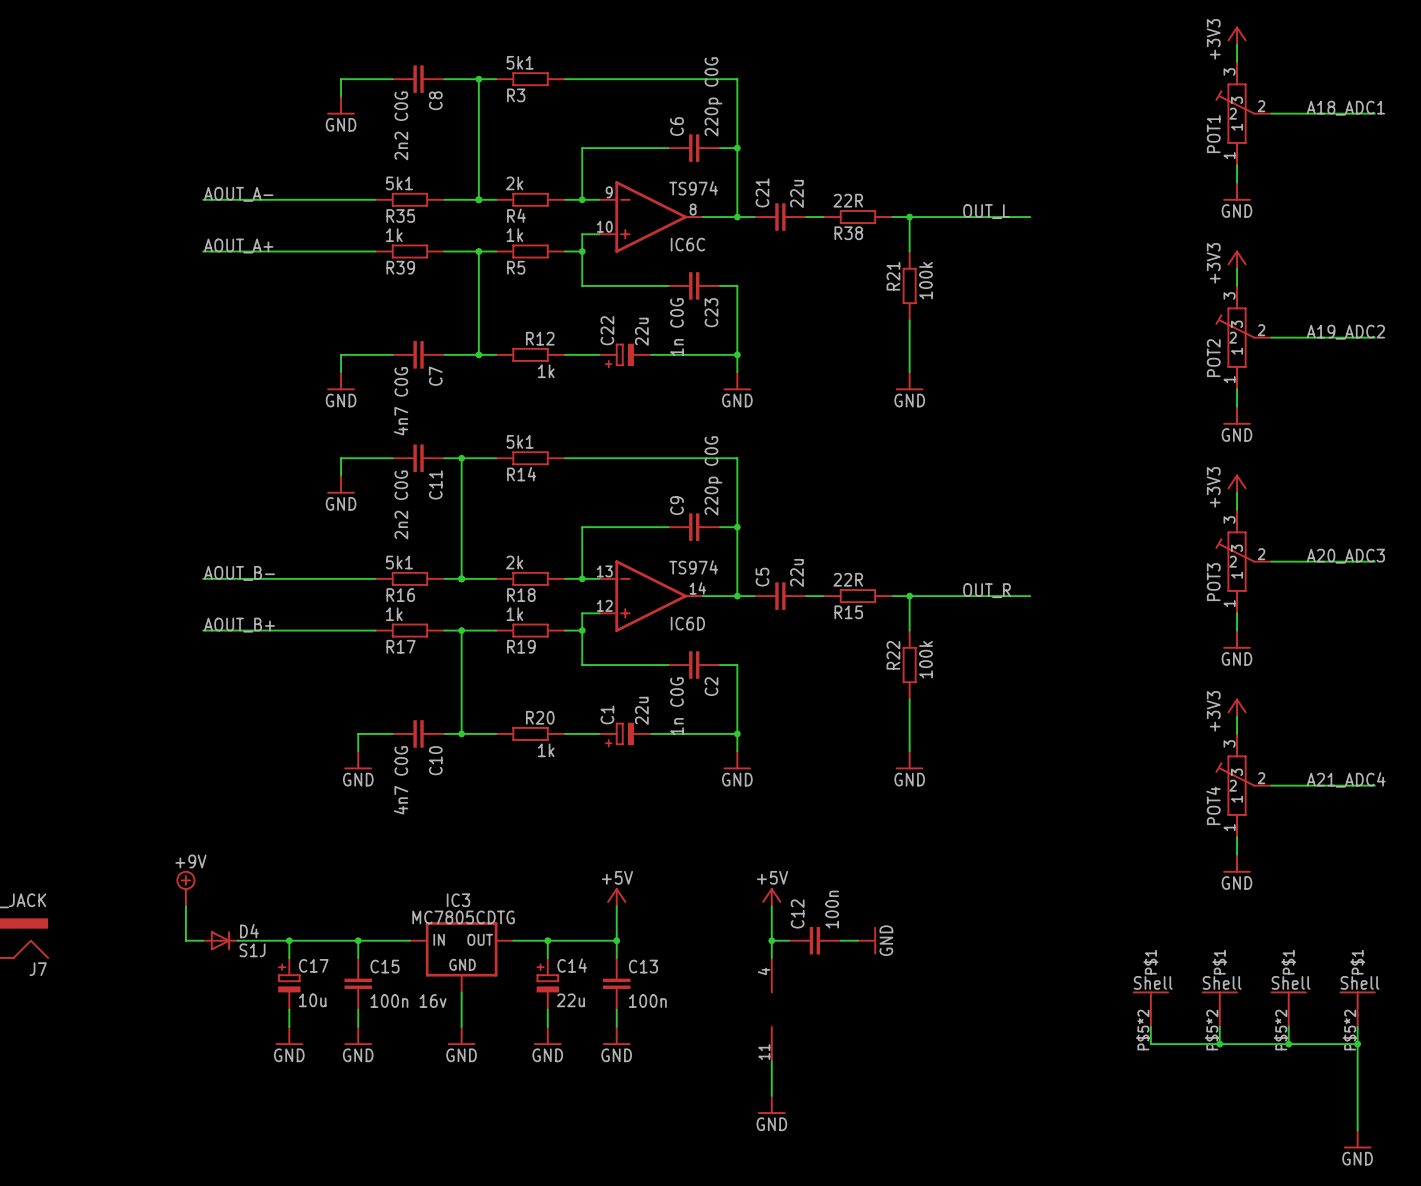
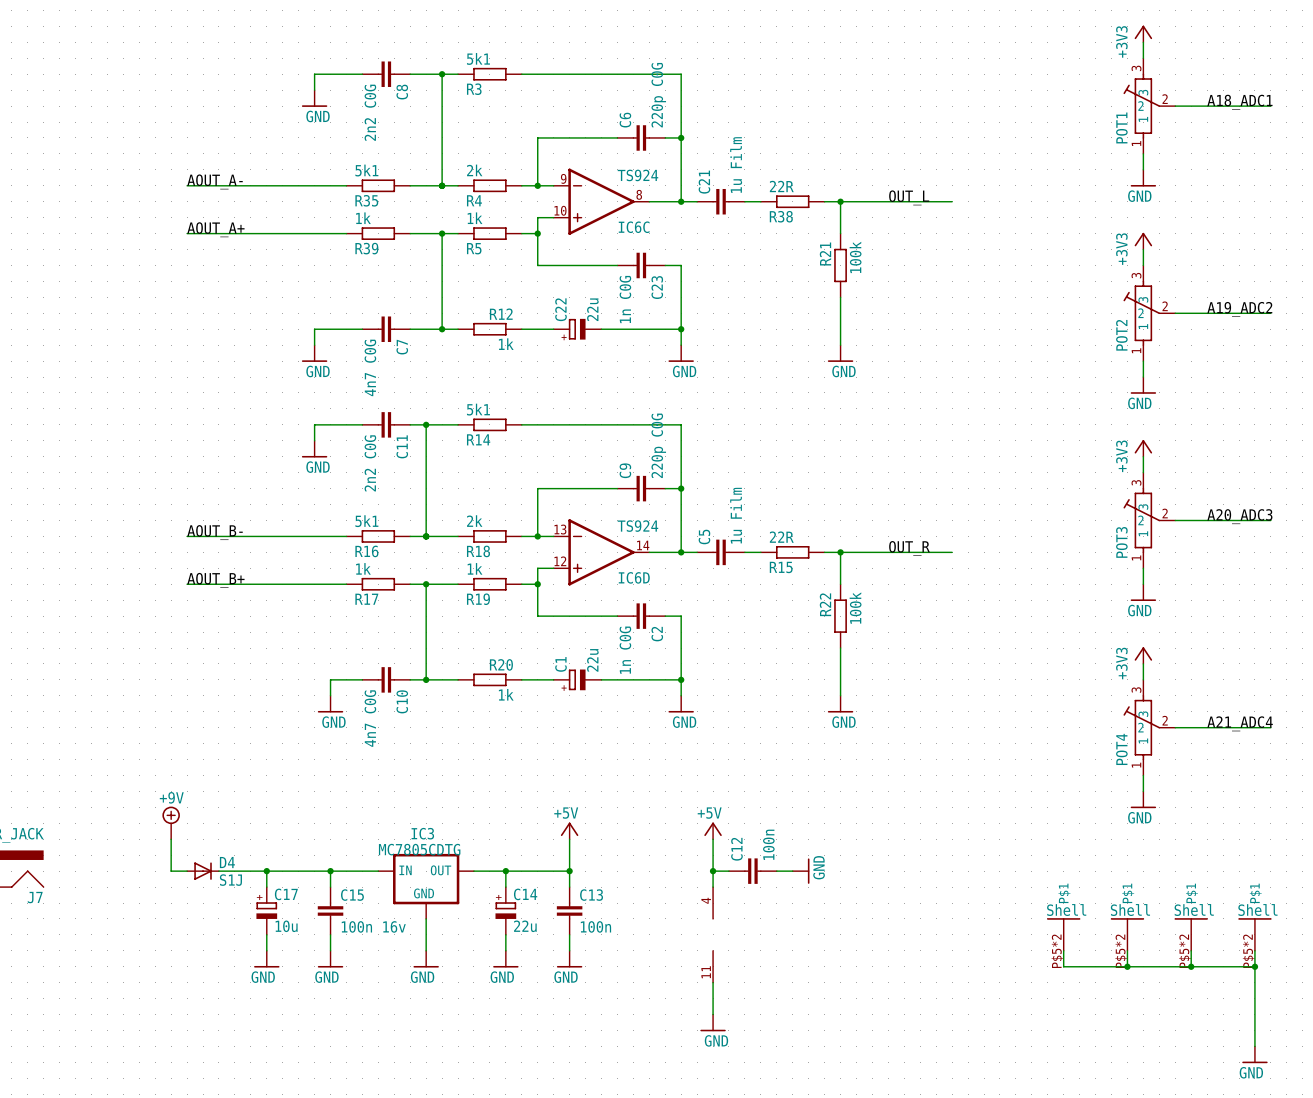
IC6C value: TS974 (693, 188) -> TS924 (637, 175)
C21 value: 22u (796, 193) -> 1u Film (736, 165)
IC6D value: TS974 (693, 567) -> TS924 (637, 526)
C5 value: 22u (796, 572) -> 1u Film (736, 515)

